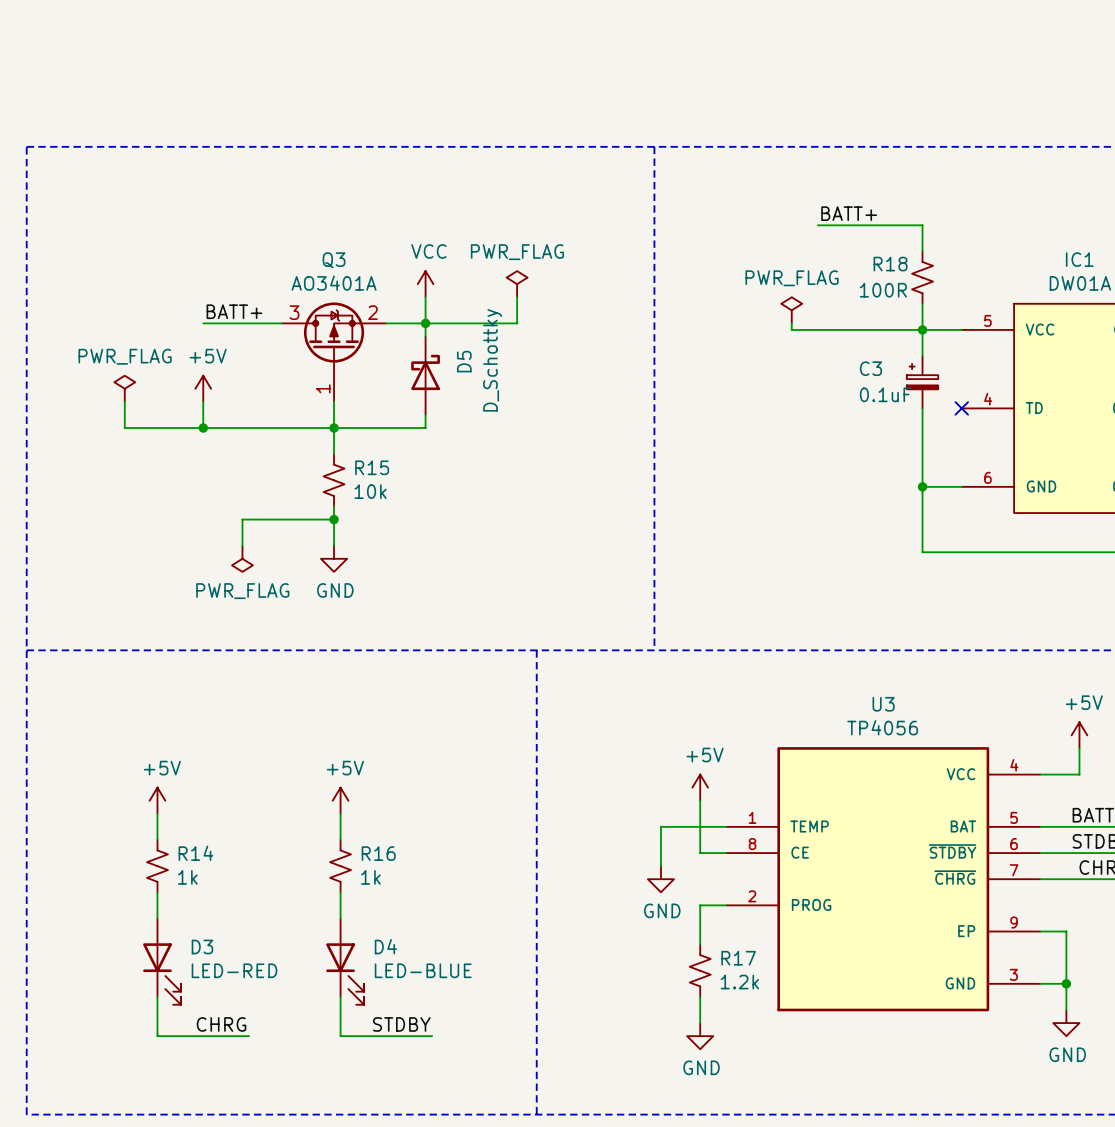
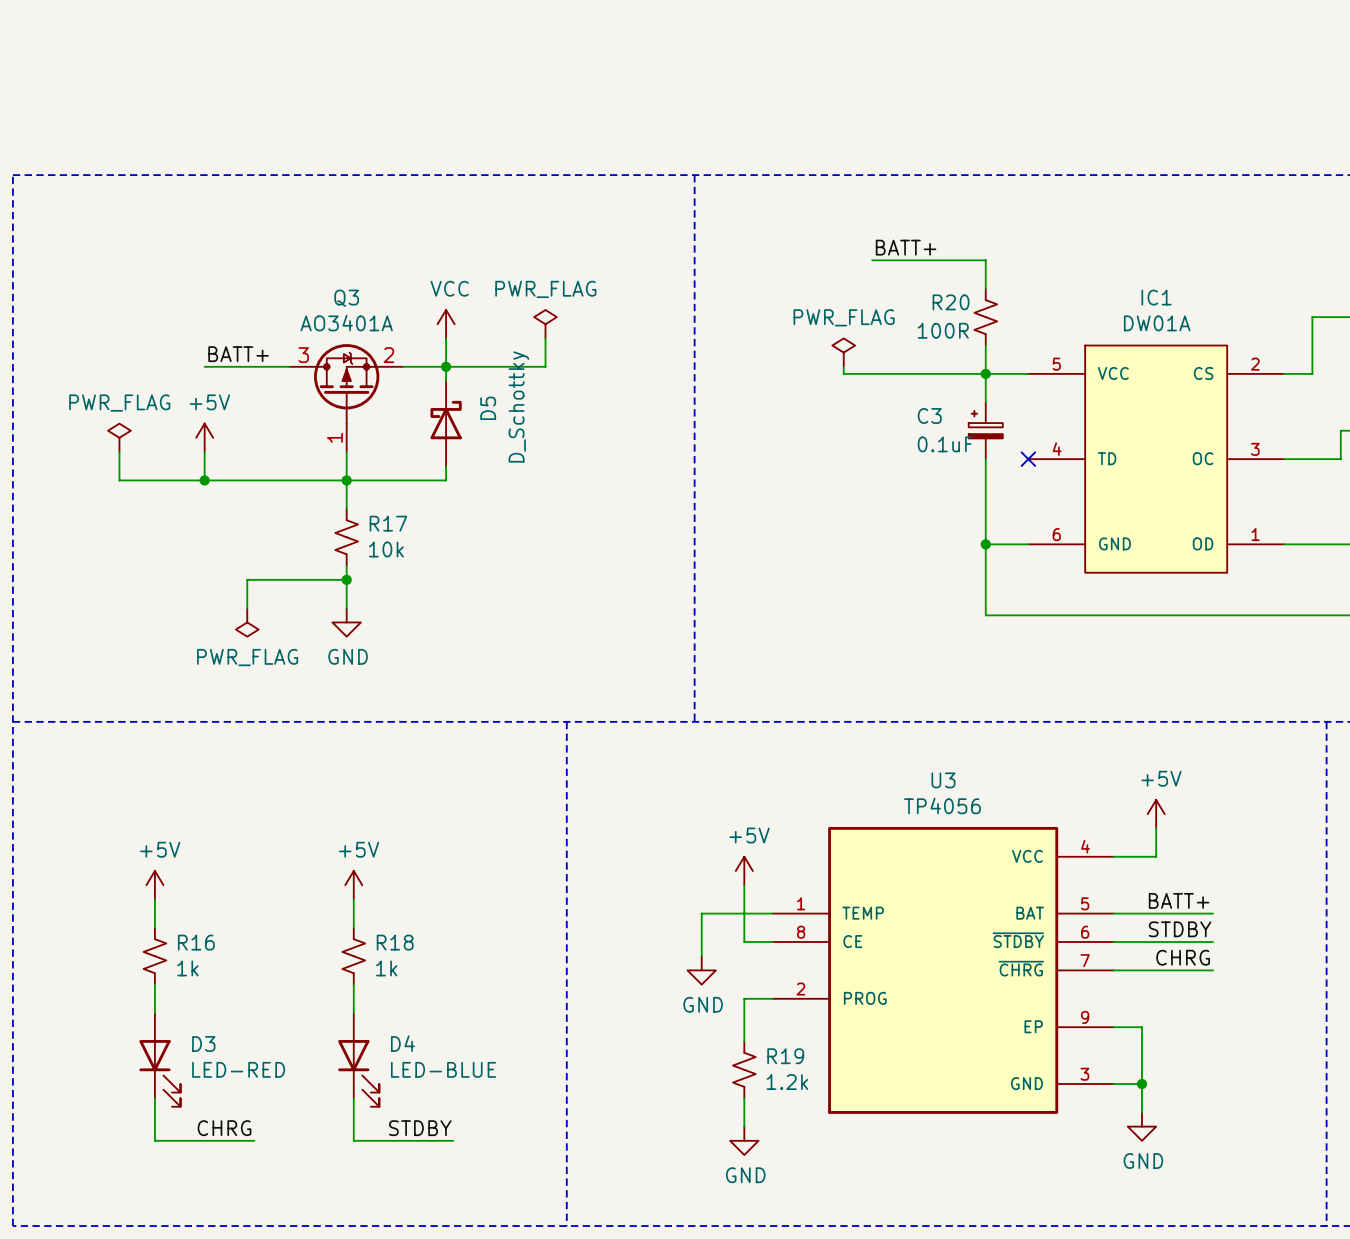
R18 name: R18 (890, 264) -> R20 (951, 302)
R15 name: R15 (372, 467) -> R17 (388, 523)
R14 name: R14 (195, 853) -> R16 (196, 942)
R16 name: R16 (378, 853) -> R18 (395, 942)
R17 name: R17 (738, 958) -> R19 (785, 1056)

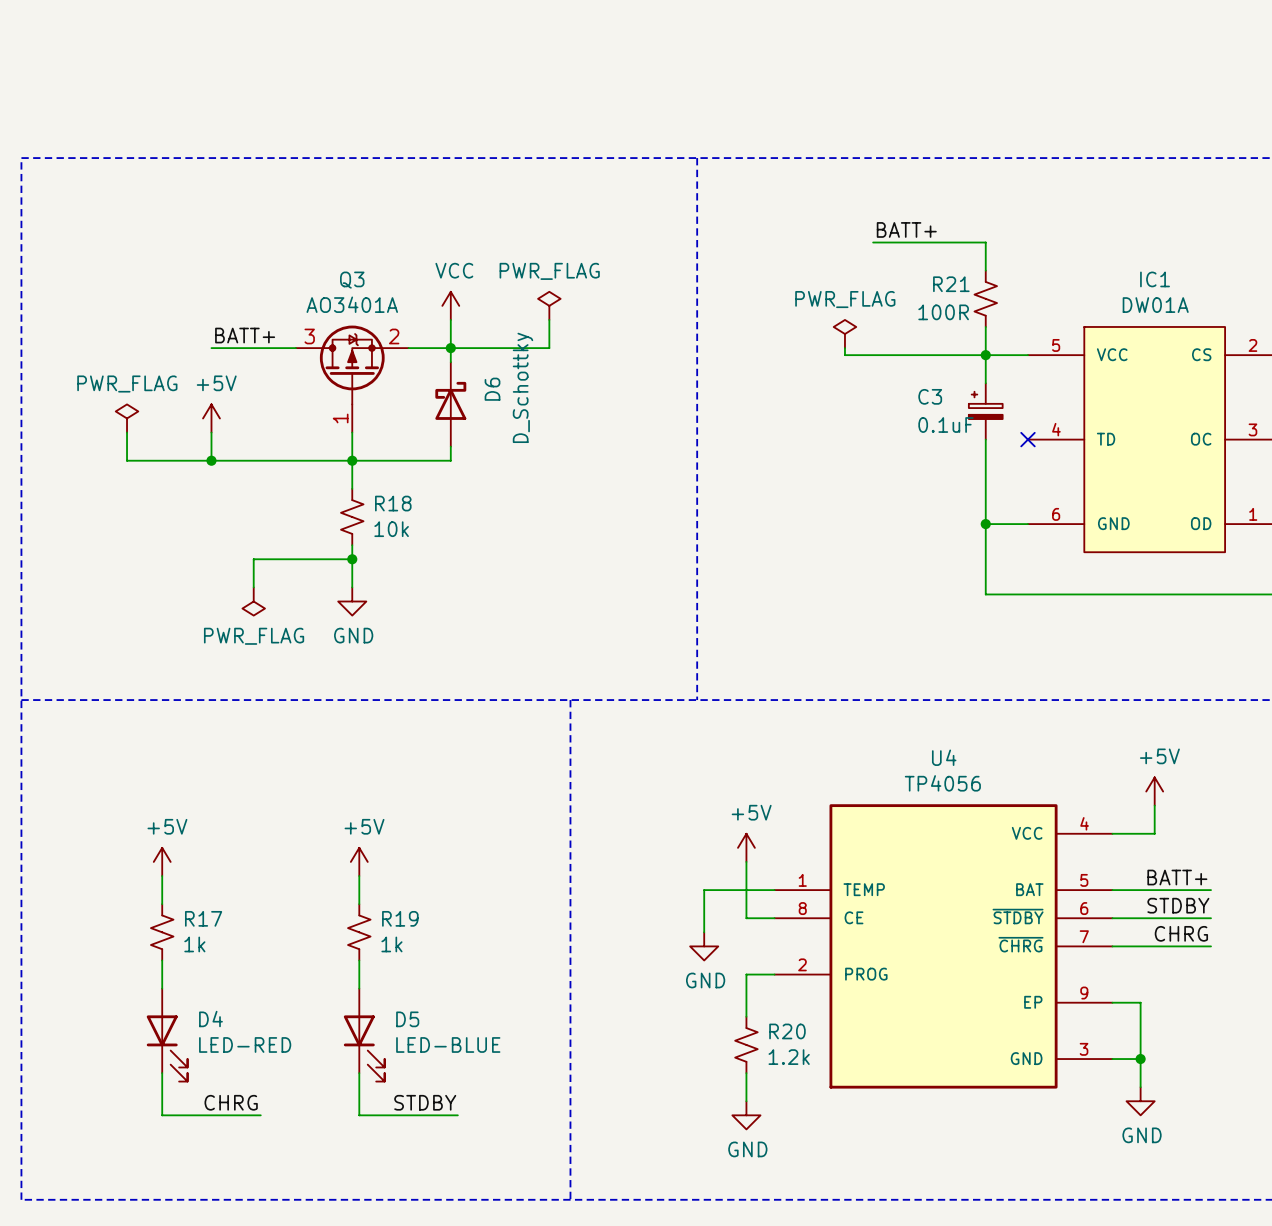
R20 name: R20 (951, 302) -> R21 (951, 284)
D5 name: D5 (488, 408) -> D6 (492, 389)
R17 name: R17 (388, 523) -> R18 (393, 503)
U3 name: U3 (943, 780) -> U4 (944, 757)
R16 name: R16 (196, 942) -> R17 (203, 918)
R18 name: R18 (395, 942) -> R19 (400, 918)
D4 name: D4 (402, 1043) -> D5 (407, 1019)
D3 name: D3 (203, 1044) -> D4 (210, 1019)
R19 name: R19 (785, 1056) -> R20 (787, 1031)

